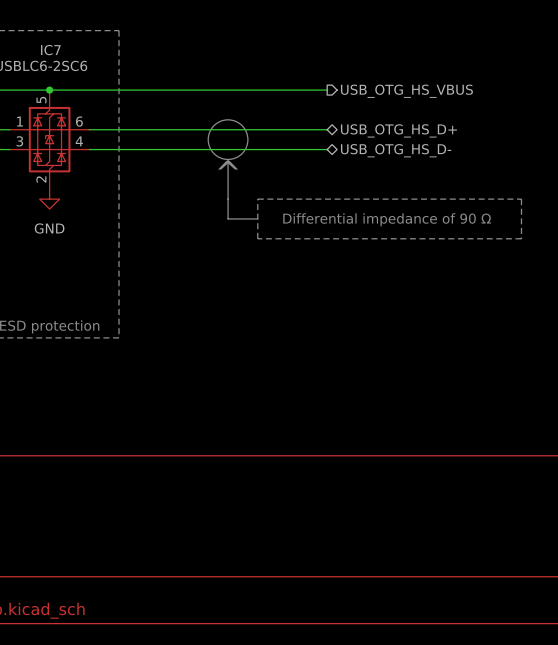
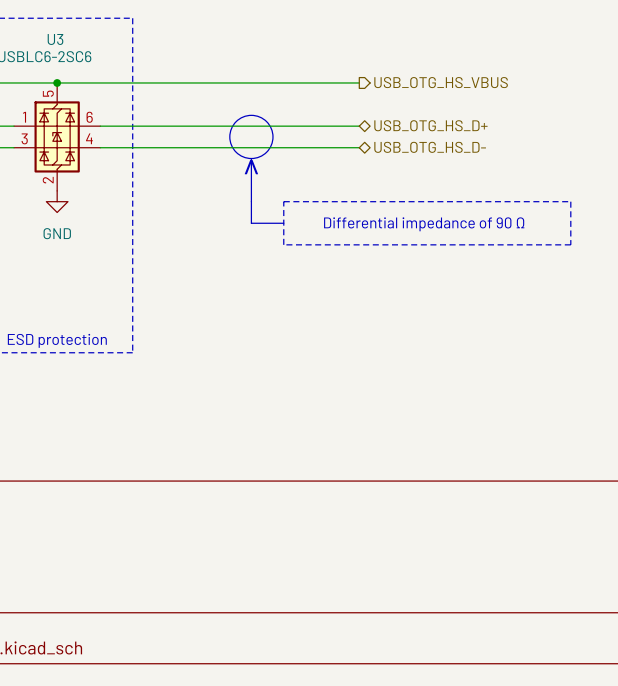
IC7 name: IC7 (50, 50) -> U3 (55, 39)

